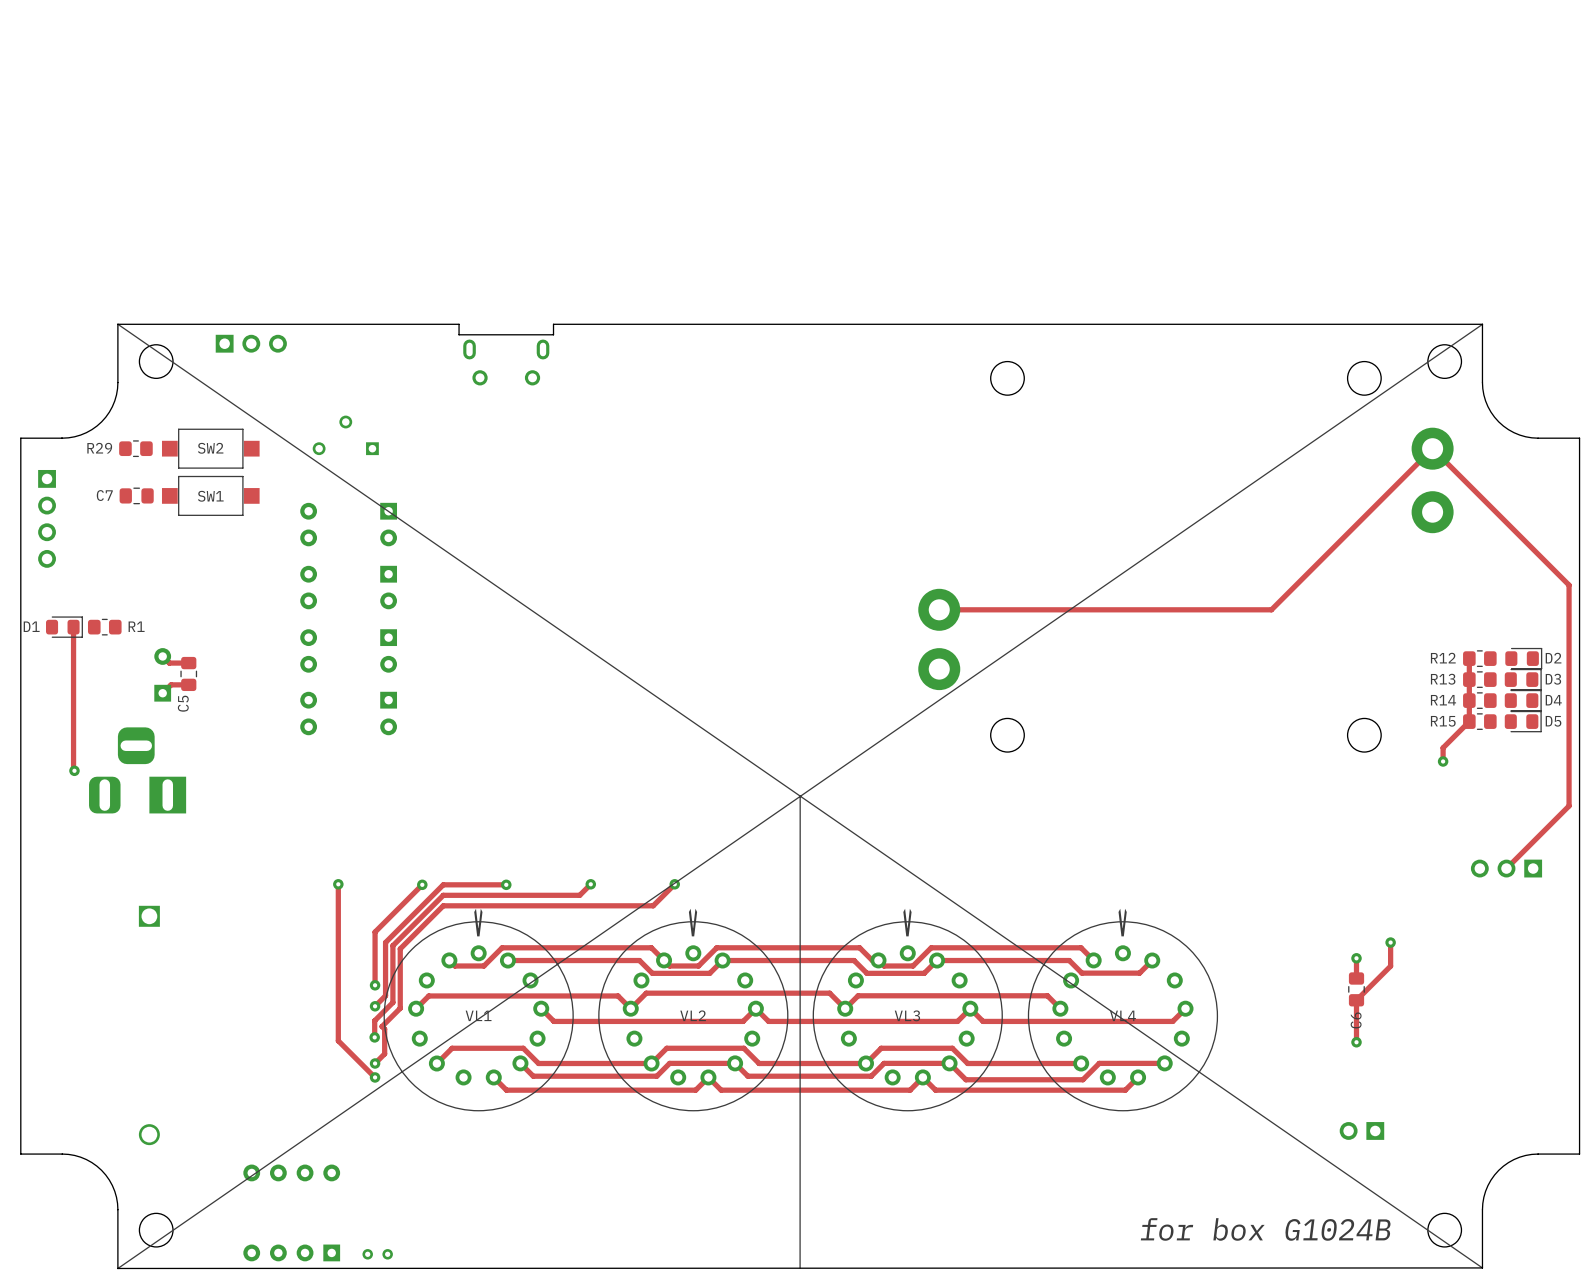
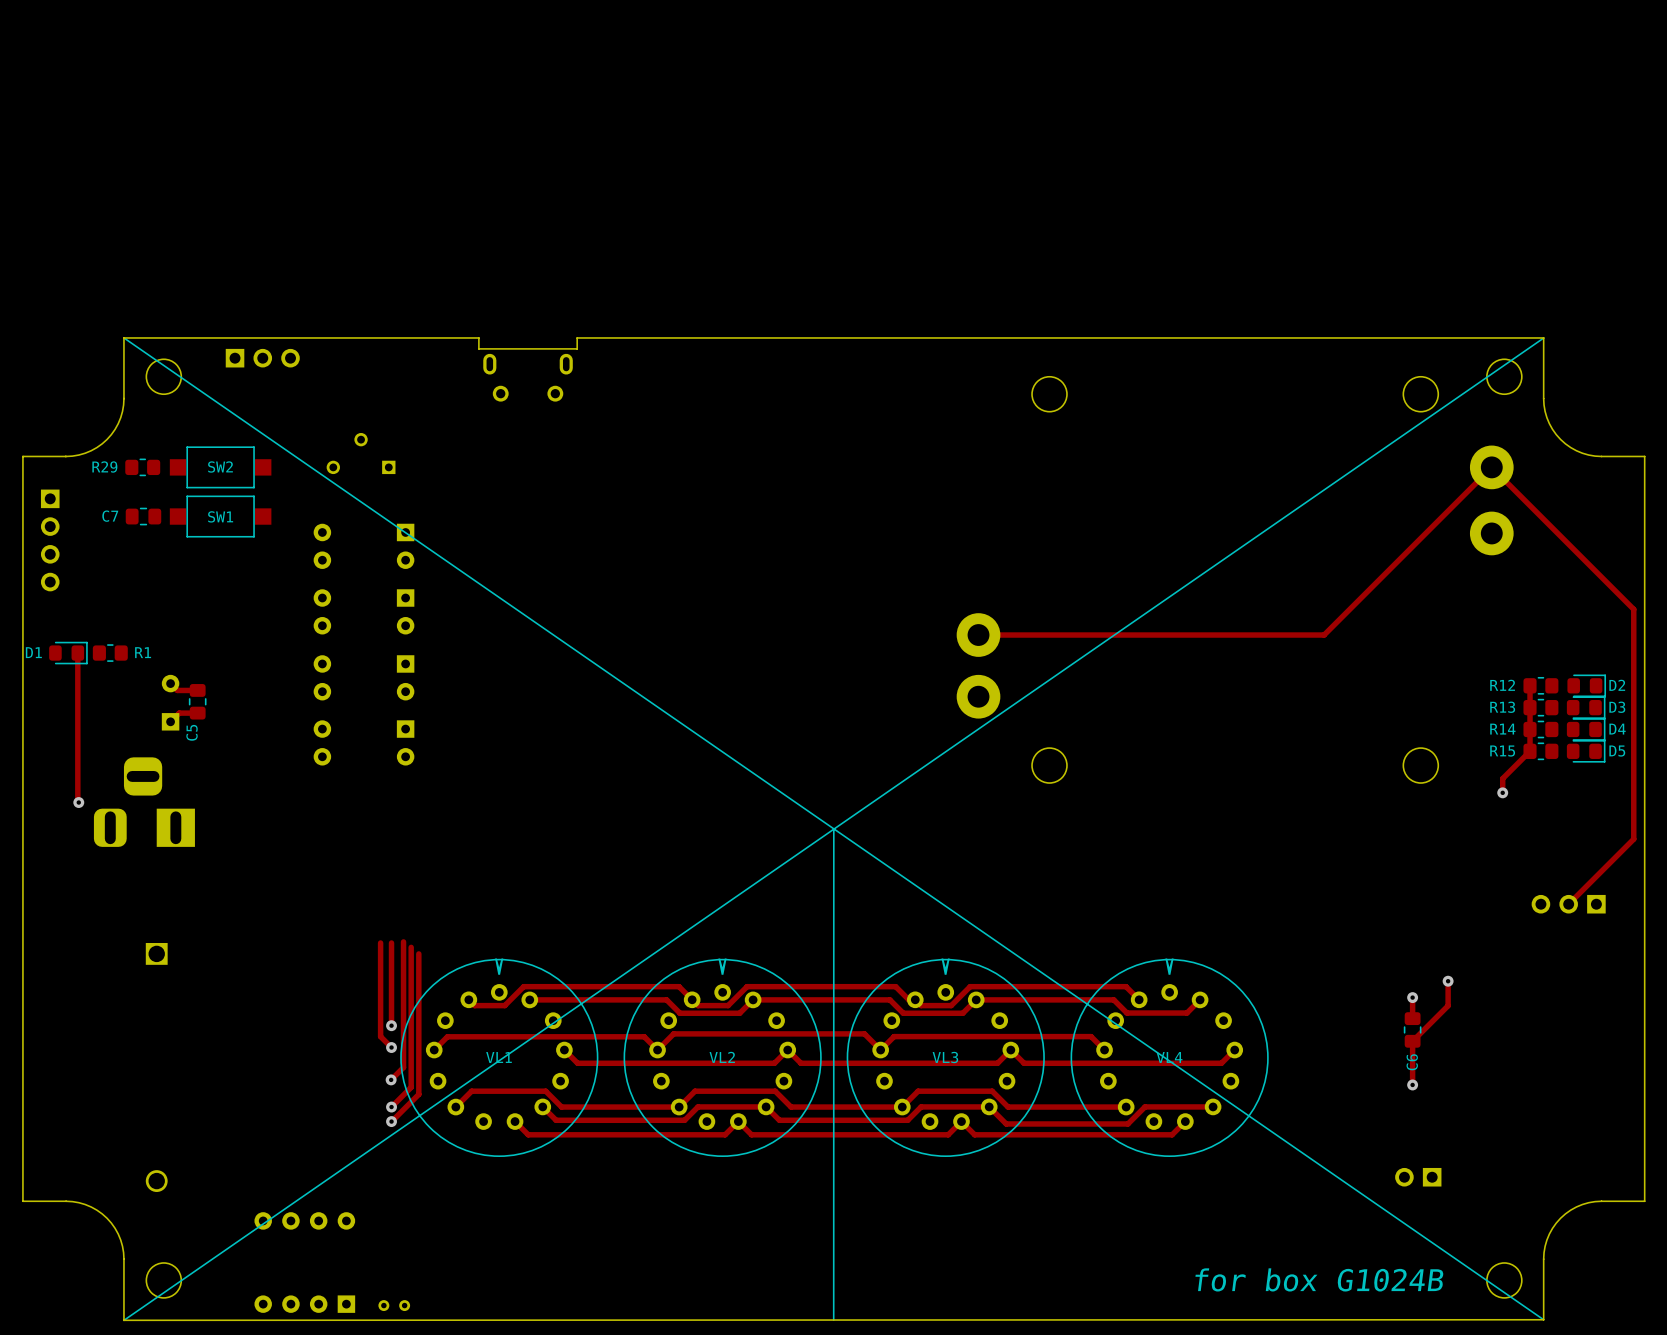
track: (338, 884) (338, 1040) (374, 1077) -> (418, 953) (418, 1094) (391, 1121)
via: (338, 884) -> none
track: (422, 884) (375, 932) -> (391, 942) (391, 970)
via: (422, 884) -> none
track: (506, 884) (443, 884) (385, 942) (385, 995) (375, 1006) -> (380, 942) (380, 1036) (391, 1047)
via: (506, 884) -> none
track: (590, 884) (579, 895) (443, 895) (392, 945) (392, 1002) (374, 1020) (374, 1037) -> (403, 941) (403, 1067) (391, 1079)
via: (590, 884) -> none
track: (674, 884) (653, 905) (443, 905) (400, 948) (400, 1008) (382, 1026) (384, 1029) (384, 1053) -> (411, 947) (411, 1087) (401, 1097)
via: (674, 884) -> none

